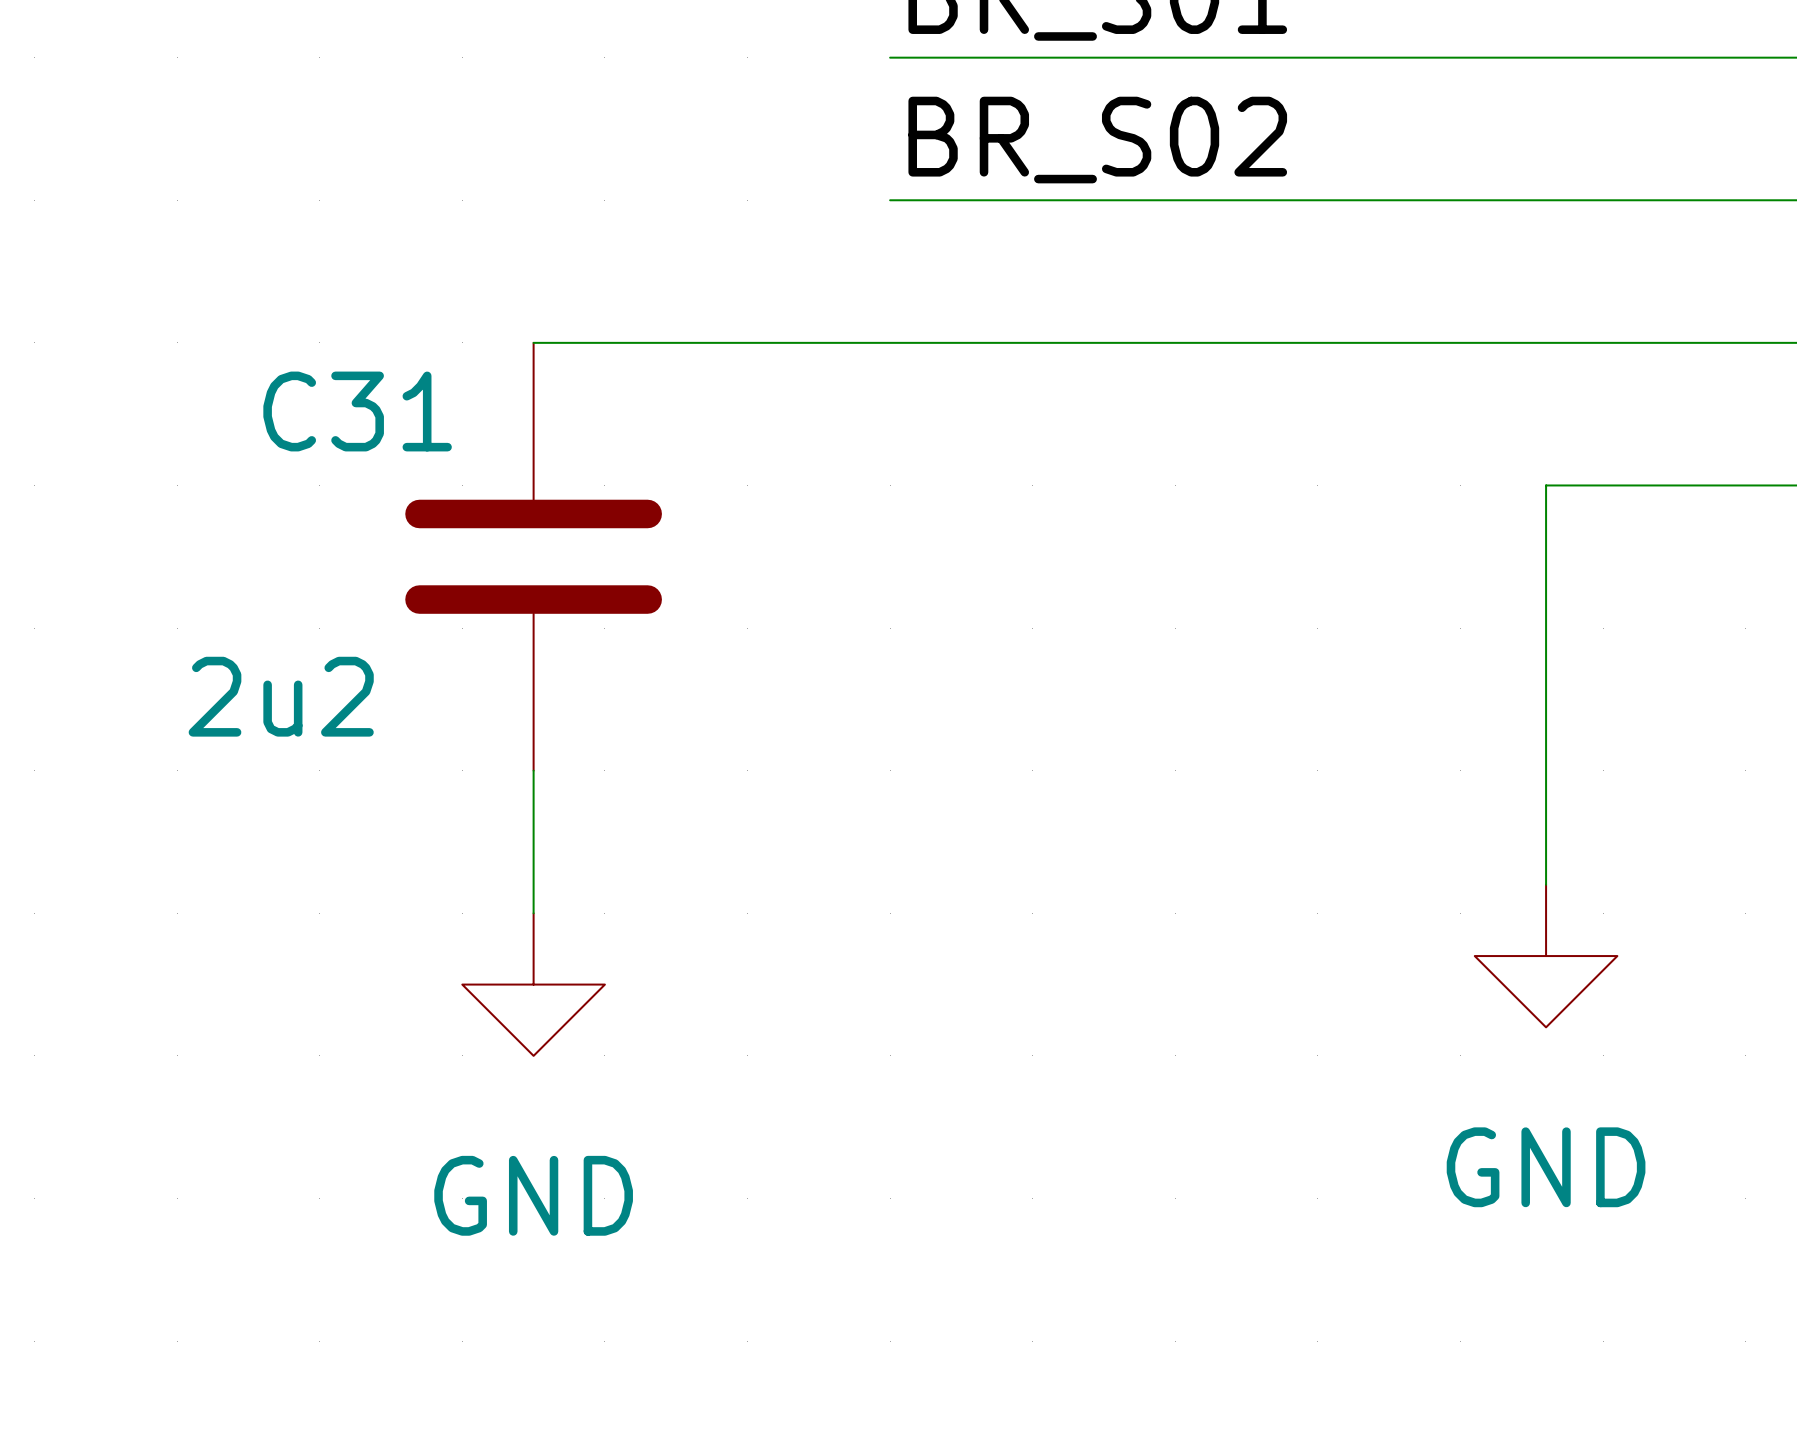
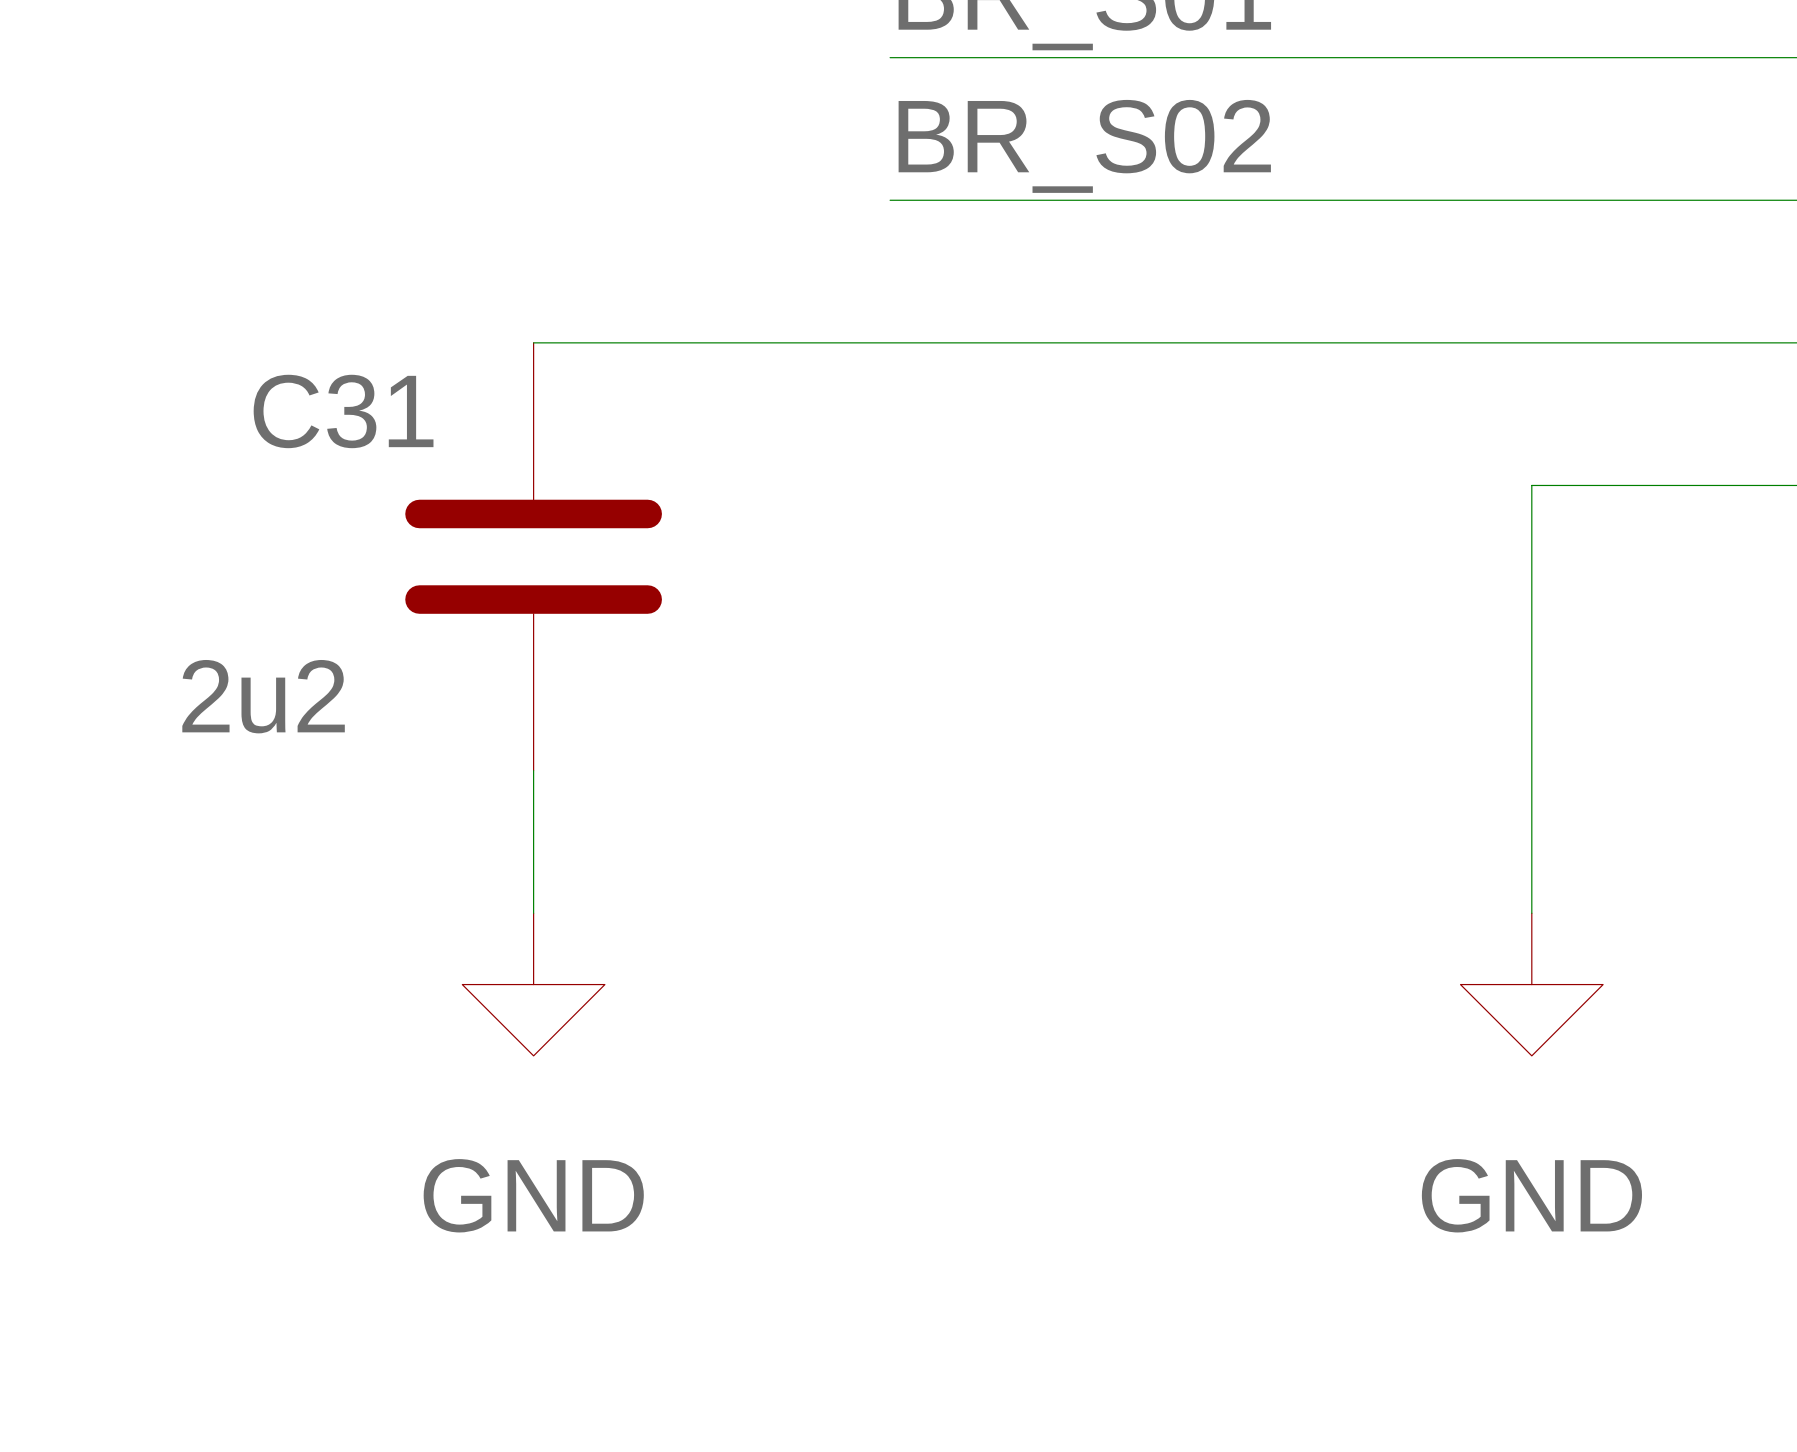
wire: (1546, 485) (1546, 884) -> (1546, 485) (1531, 485) (1531, 913)
power symbol position: GND (1546, 956) -> GND (1531, 984)

